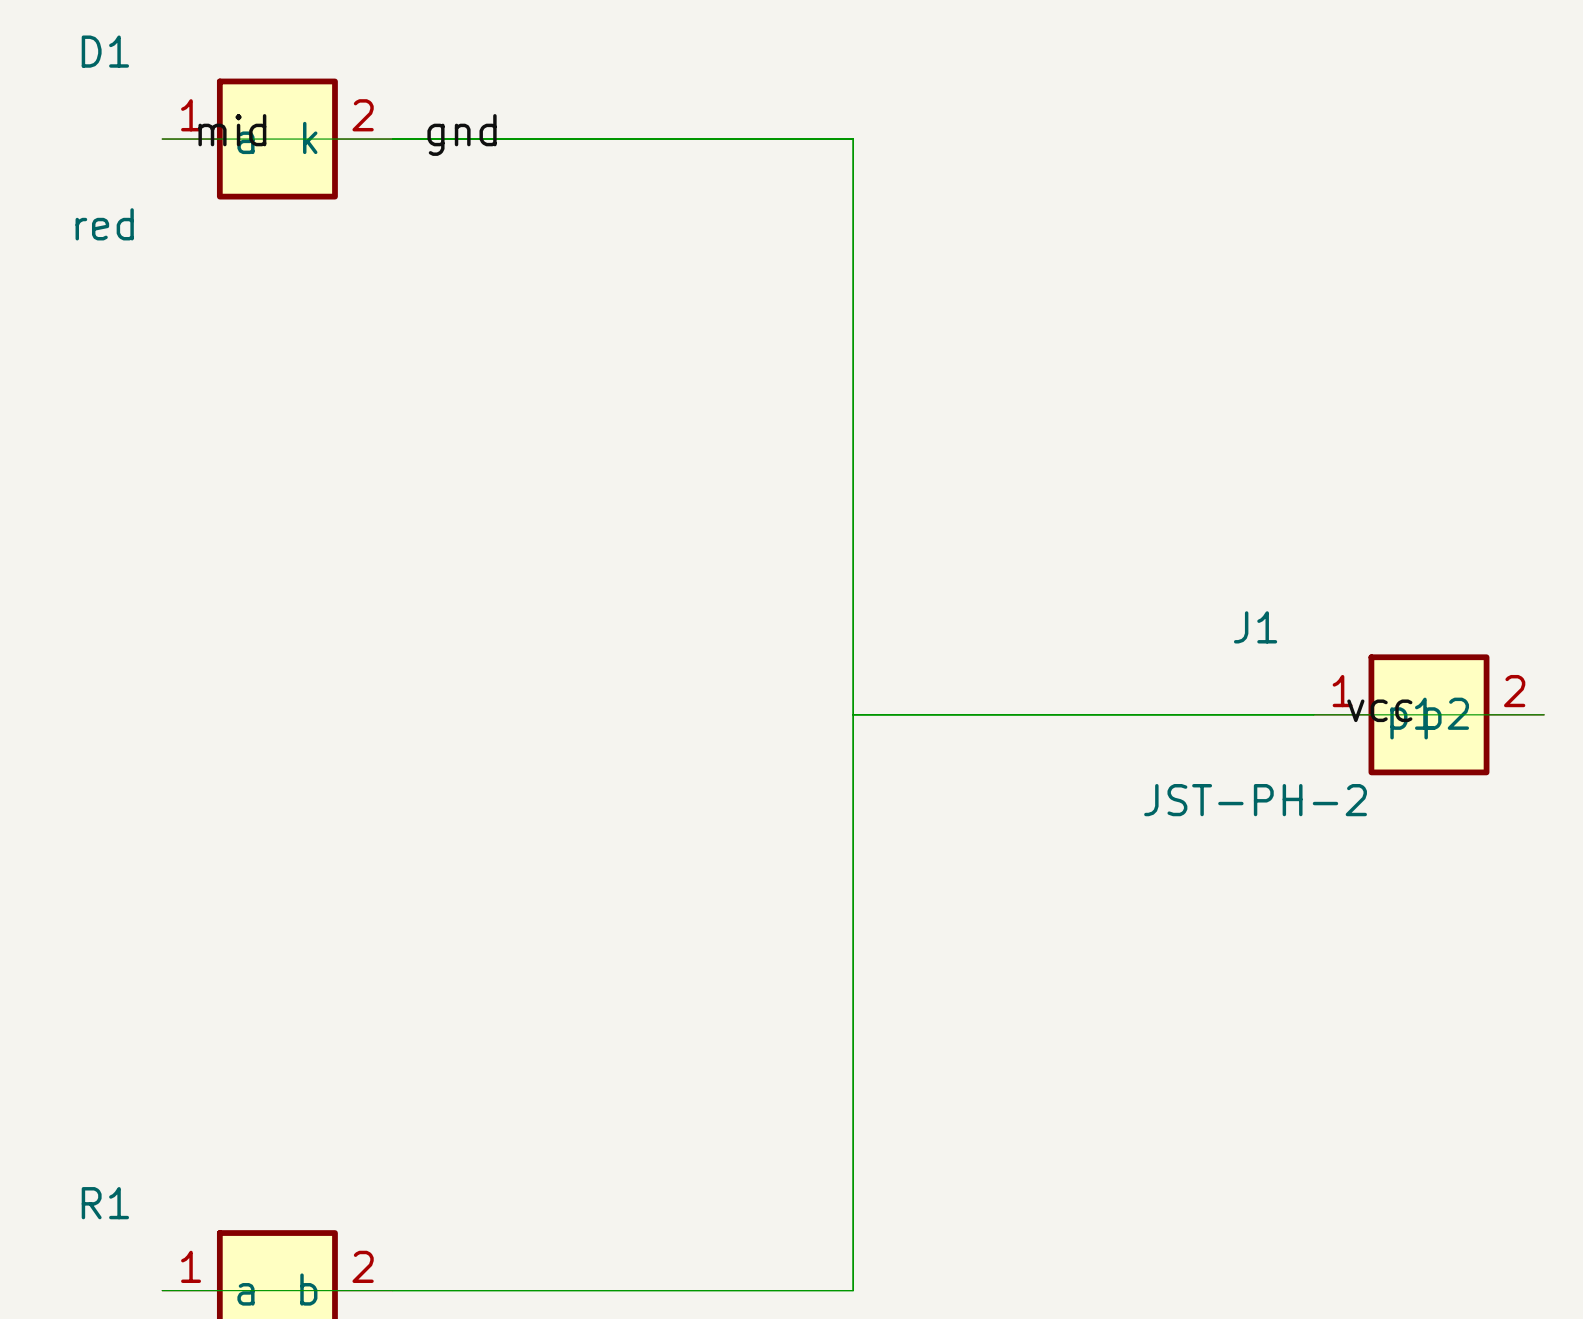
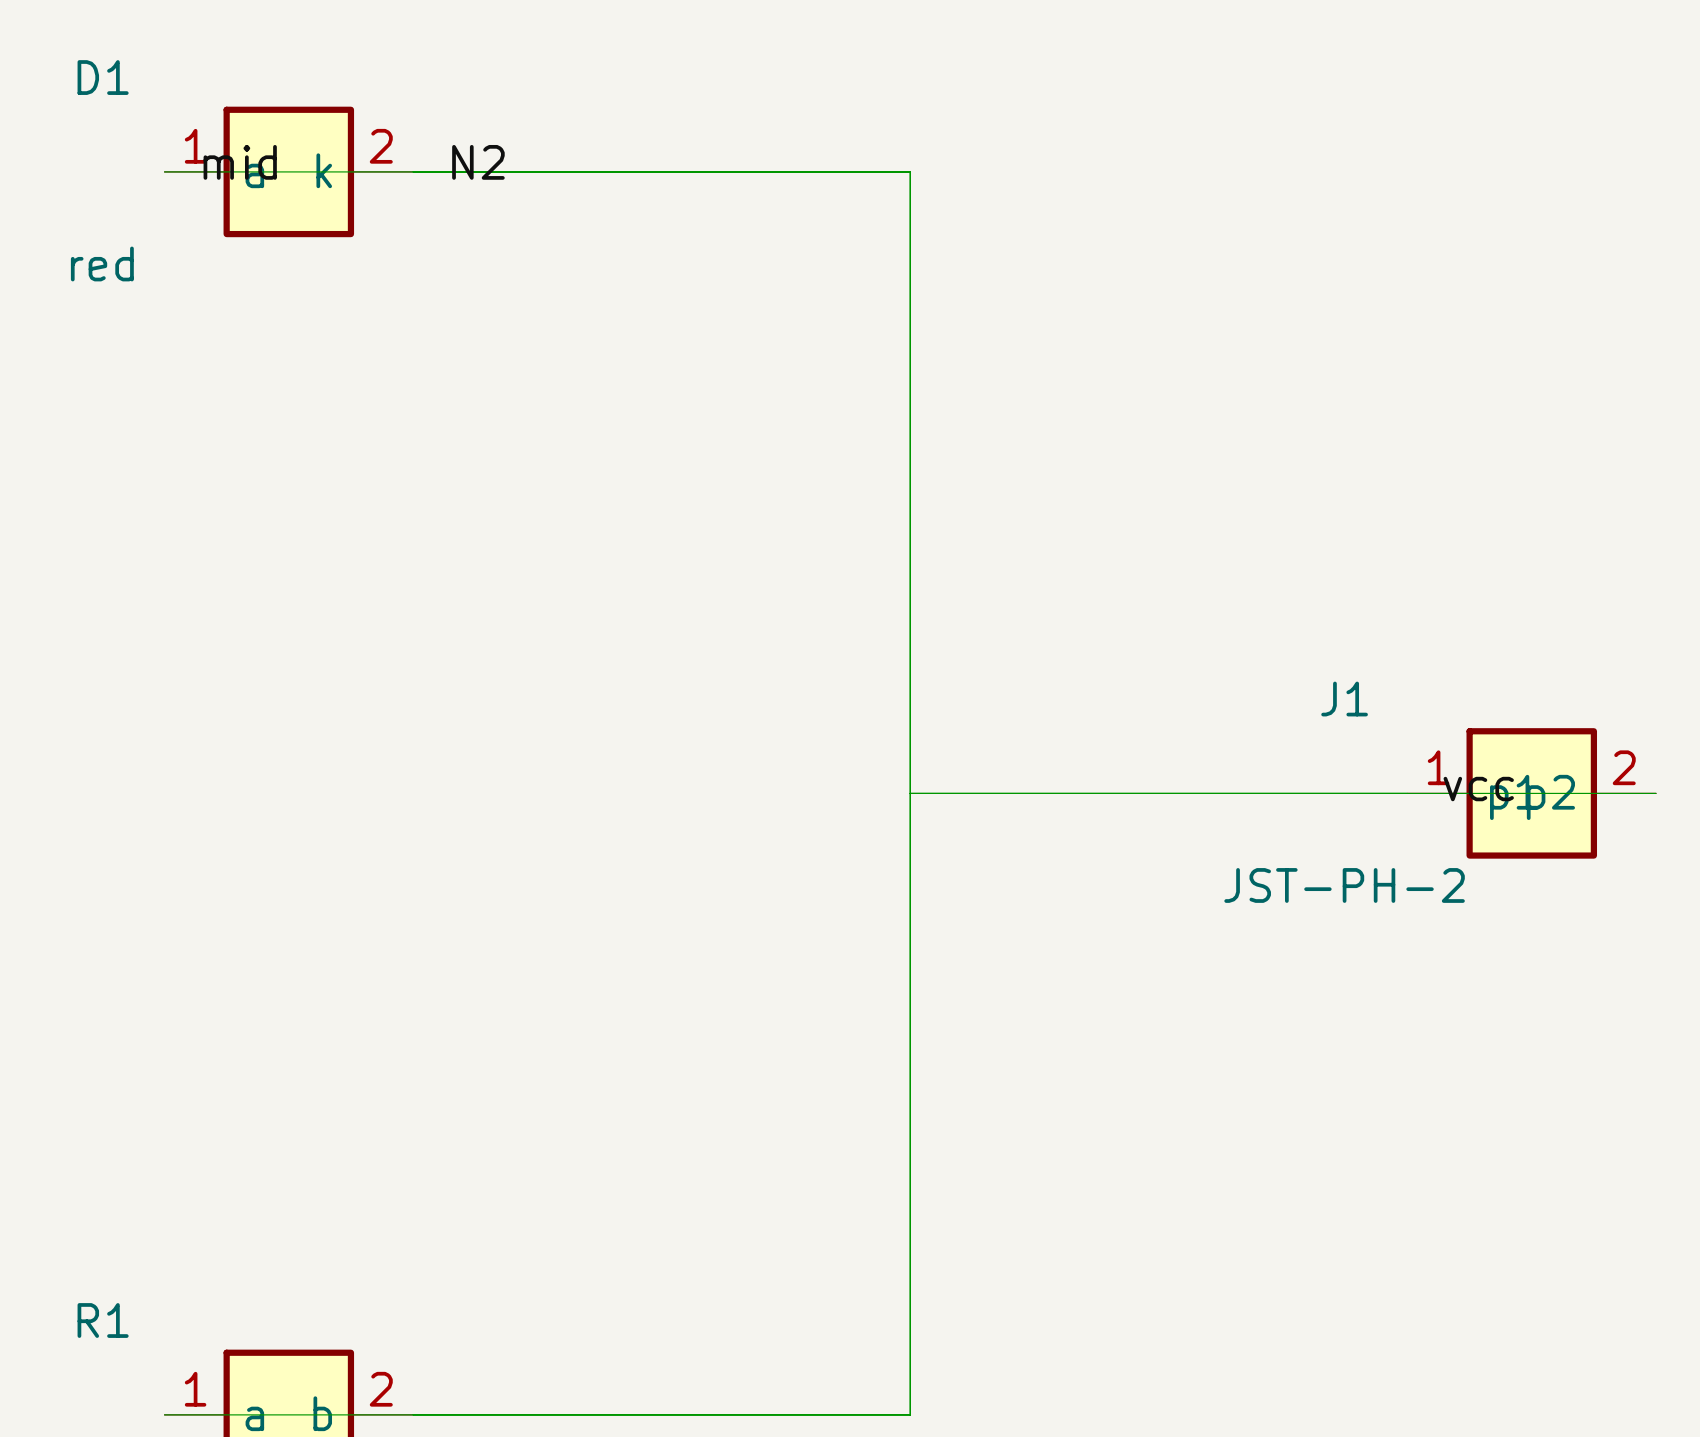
label: gnd (462, 134) -> N2 (478, 162)

